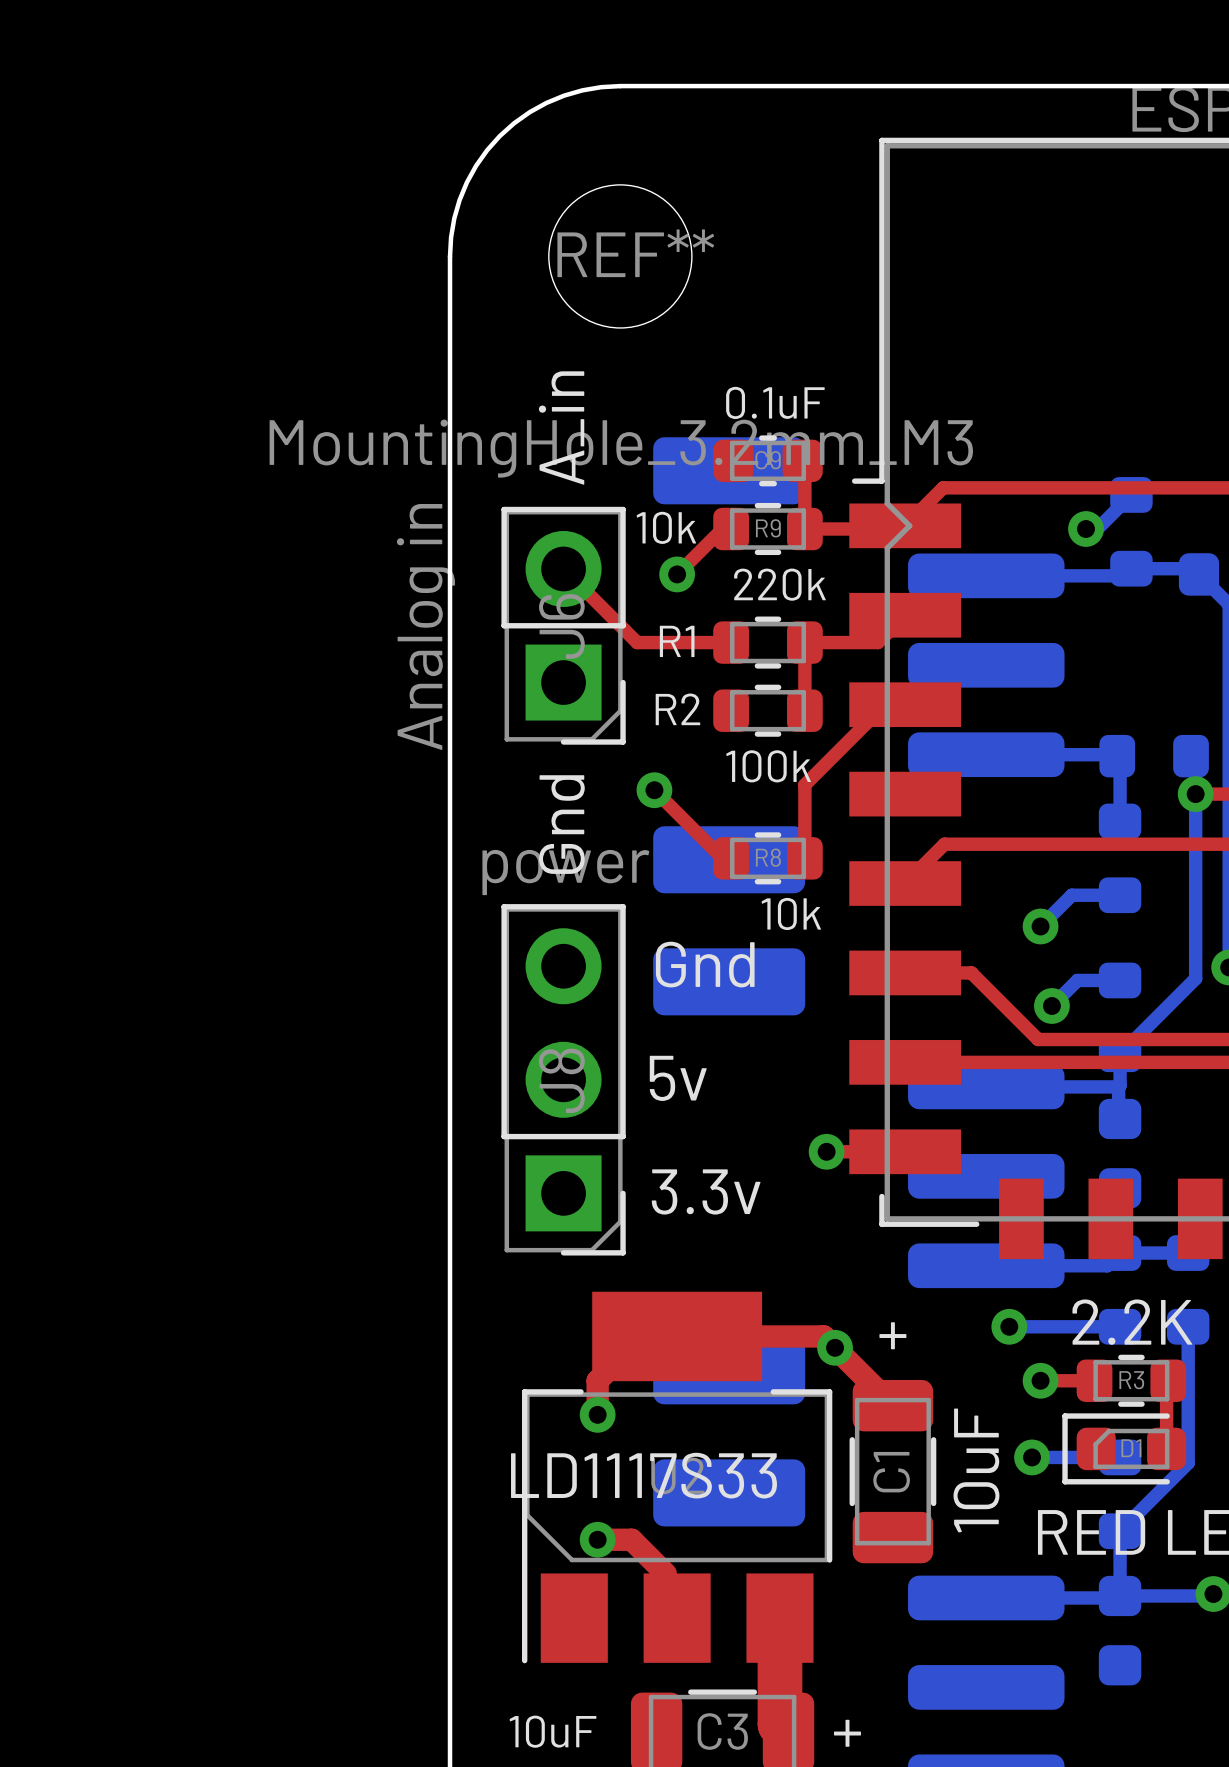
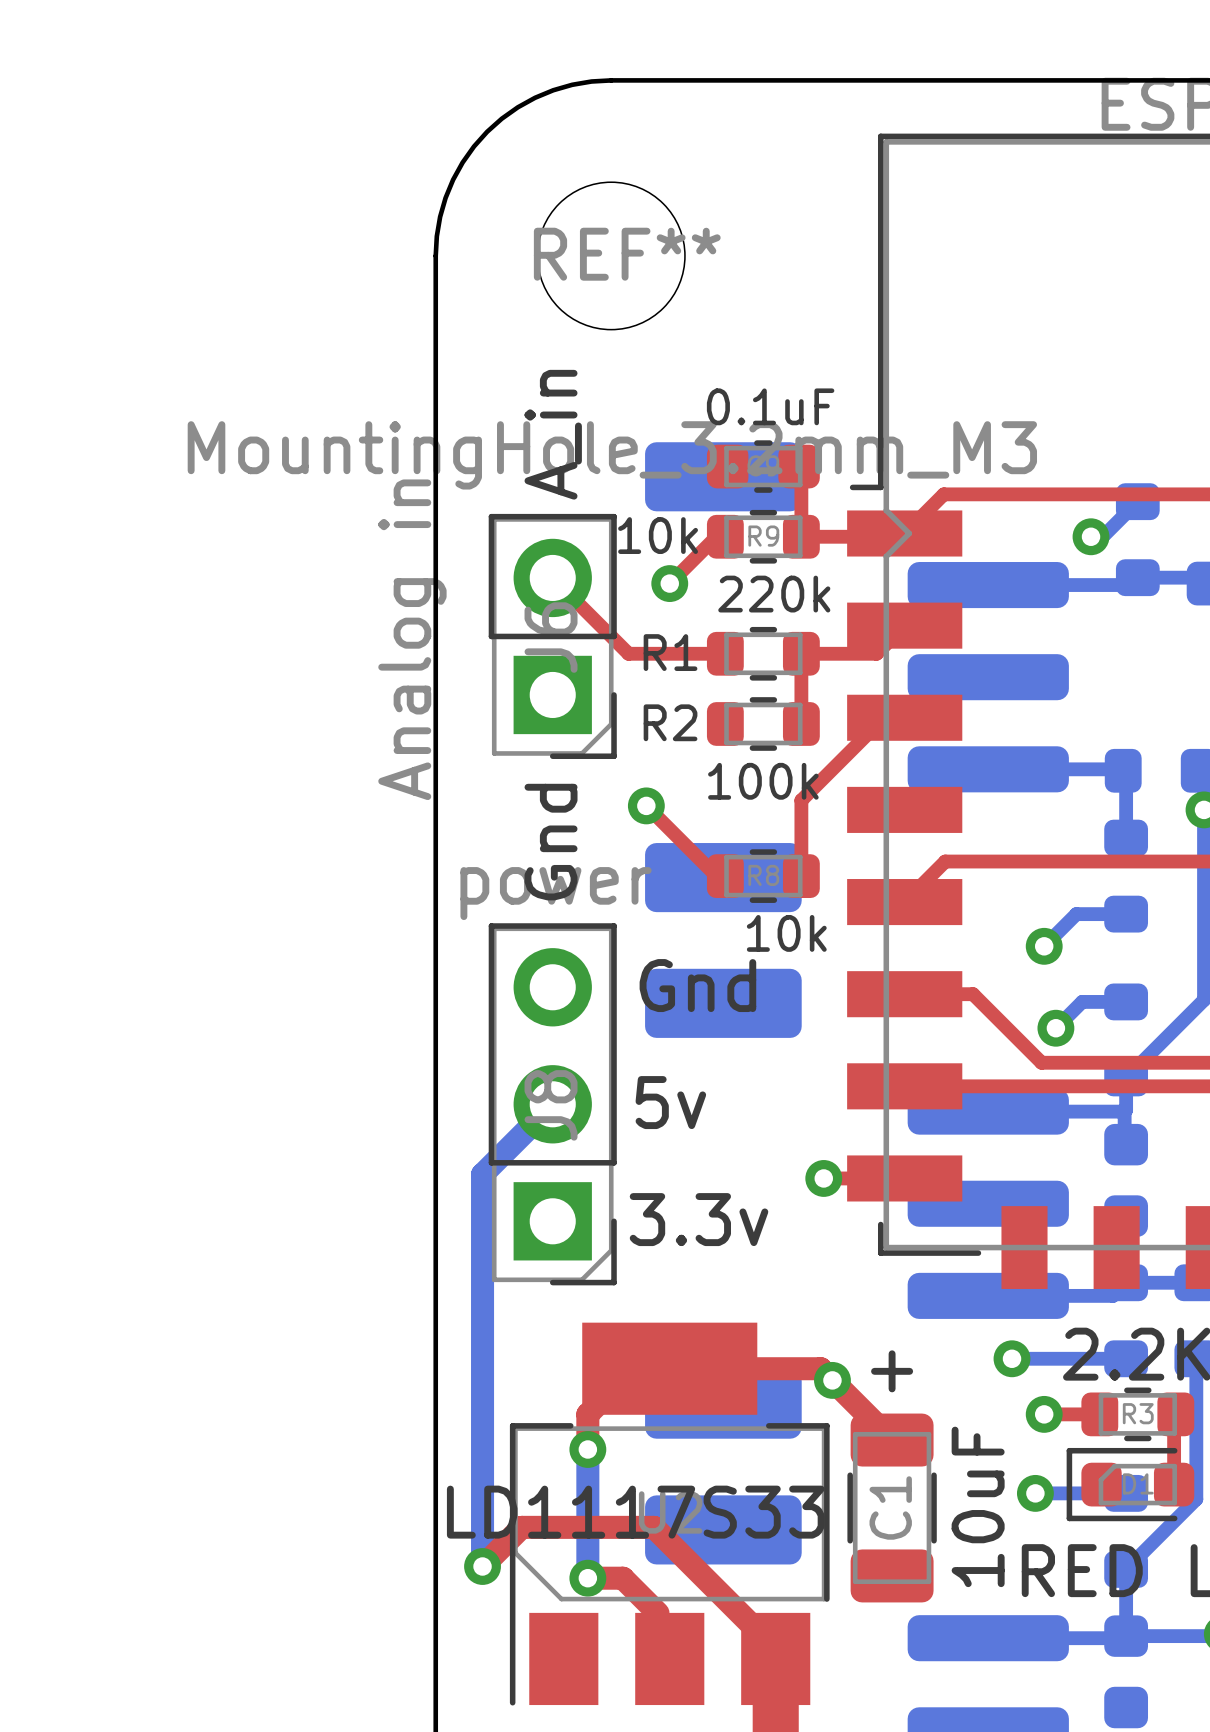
bottom track: none -> (552, 1104) (482, 1174) (482, 1566)
bottom track: none -> (587, 1449) (587, 1578)
top track: none -> (482, 1566) (521, 1527) (654, 1527) (775, 1649)
via: none -> (482, 1566)

